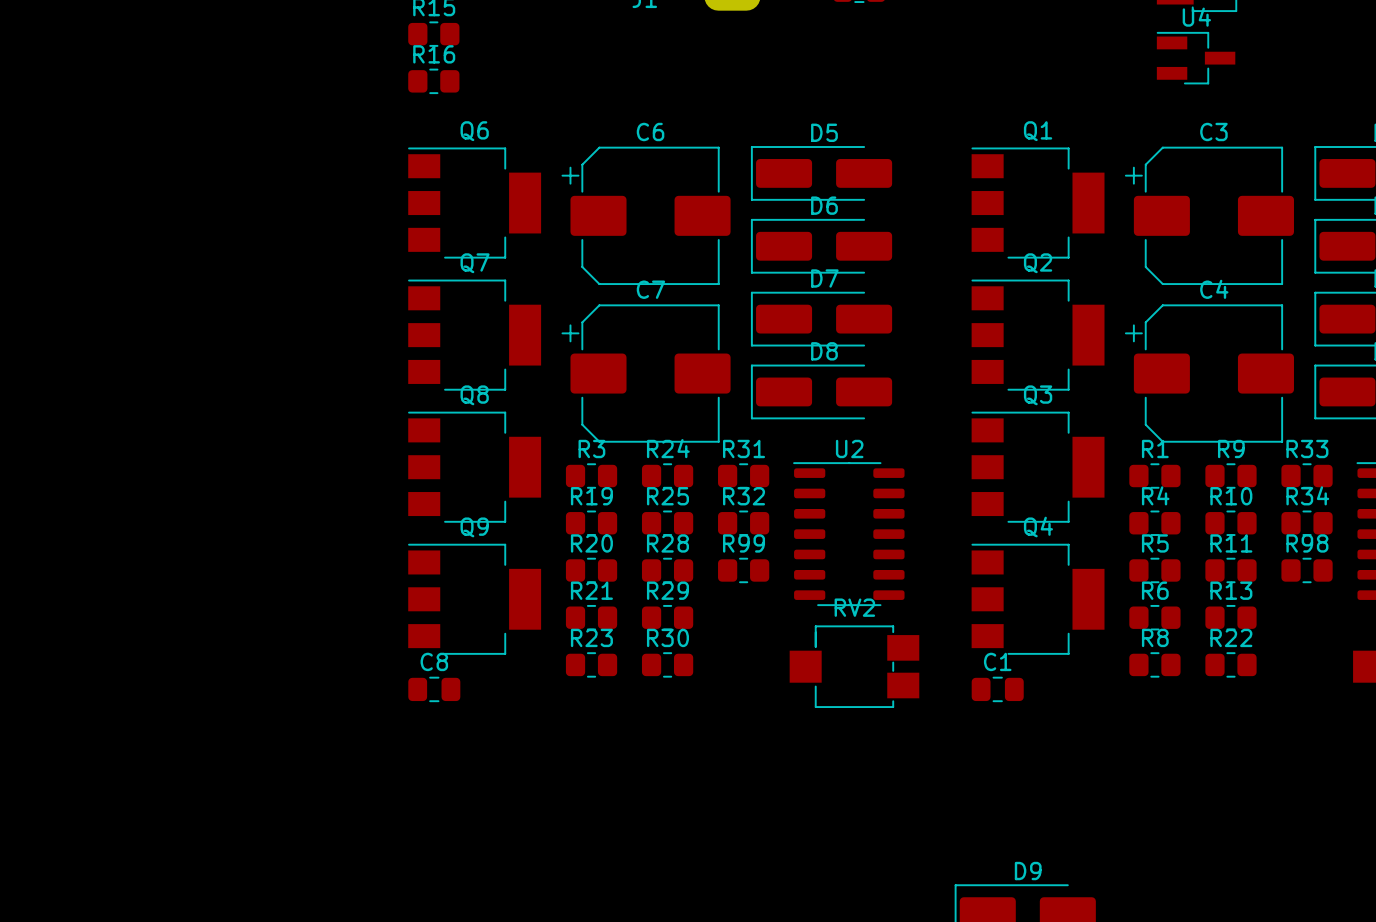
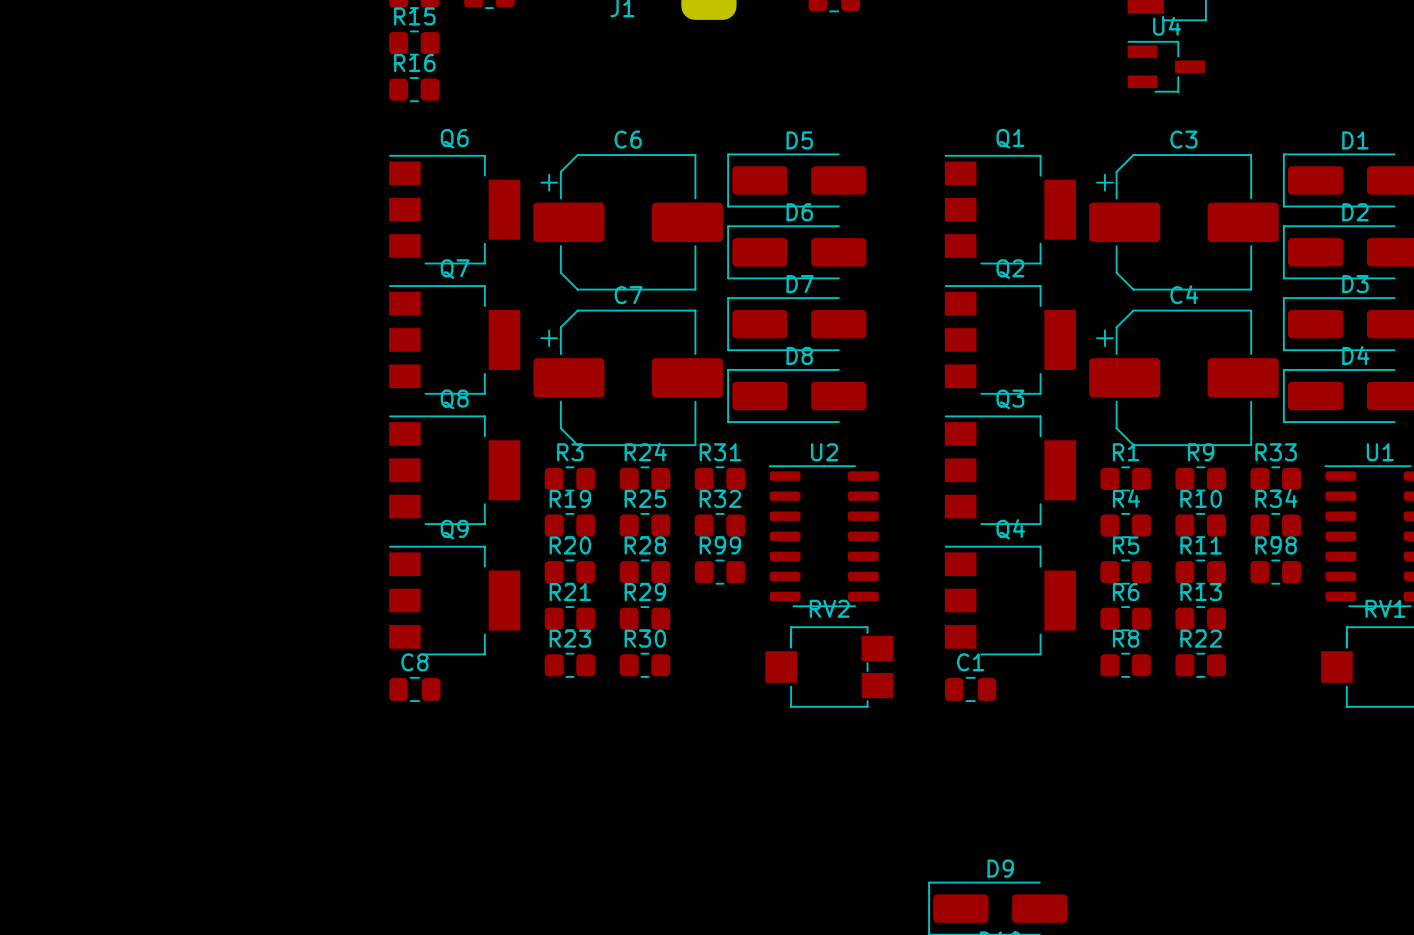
C6 footprint: [561, 146, 731, 286] -> [533, 154, 723, 291]
C3 footprint: [1124, 146, 1294, 286] -> [1089, 154, 1279, 291]
C7 footprint: [561, 304, 731, 443] -> [533, 309, 723, 447]
C4 footprint: [1124, 304, 1294, 443] -> [1089, 309, 1279, 447]

